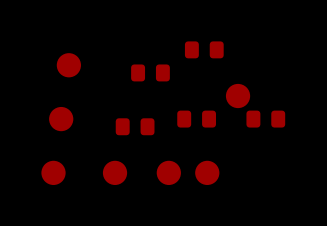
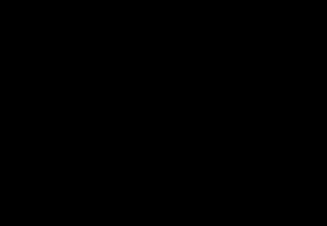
part: (204, 49) -> none
part: (68, 65) -> none
part: (150, 72) -> none
part: (238, 96) -> none
part: (61, 119) -> none
part: (196, 119) -> none
part: (265, 119) -> none
part: (135, 126) -> none
part: (53, 172) -> none
part: (115, 172) -> none
part: (168, 172) -> none
part: (207, 172) -> none

